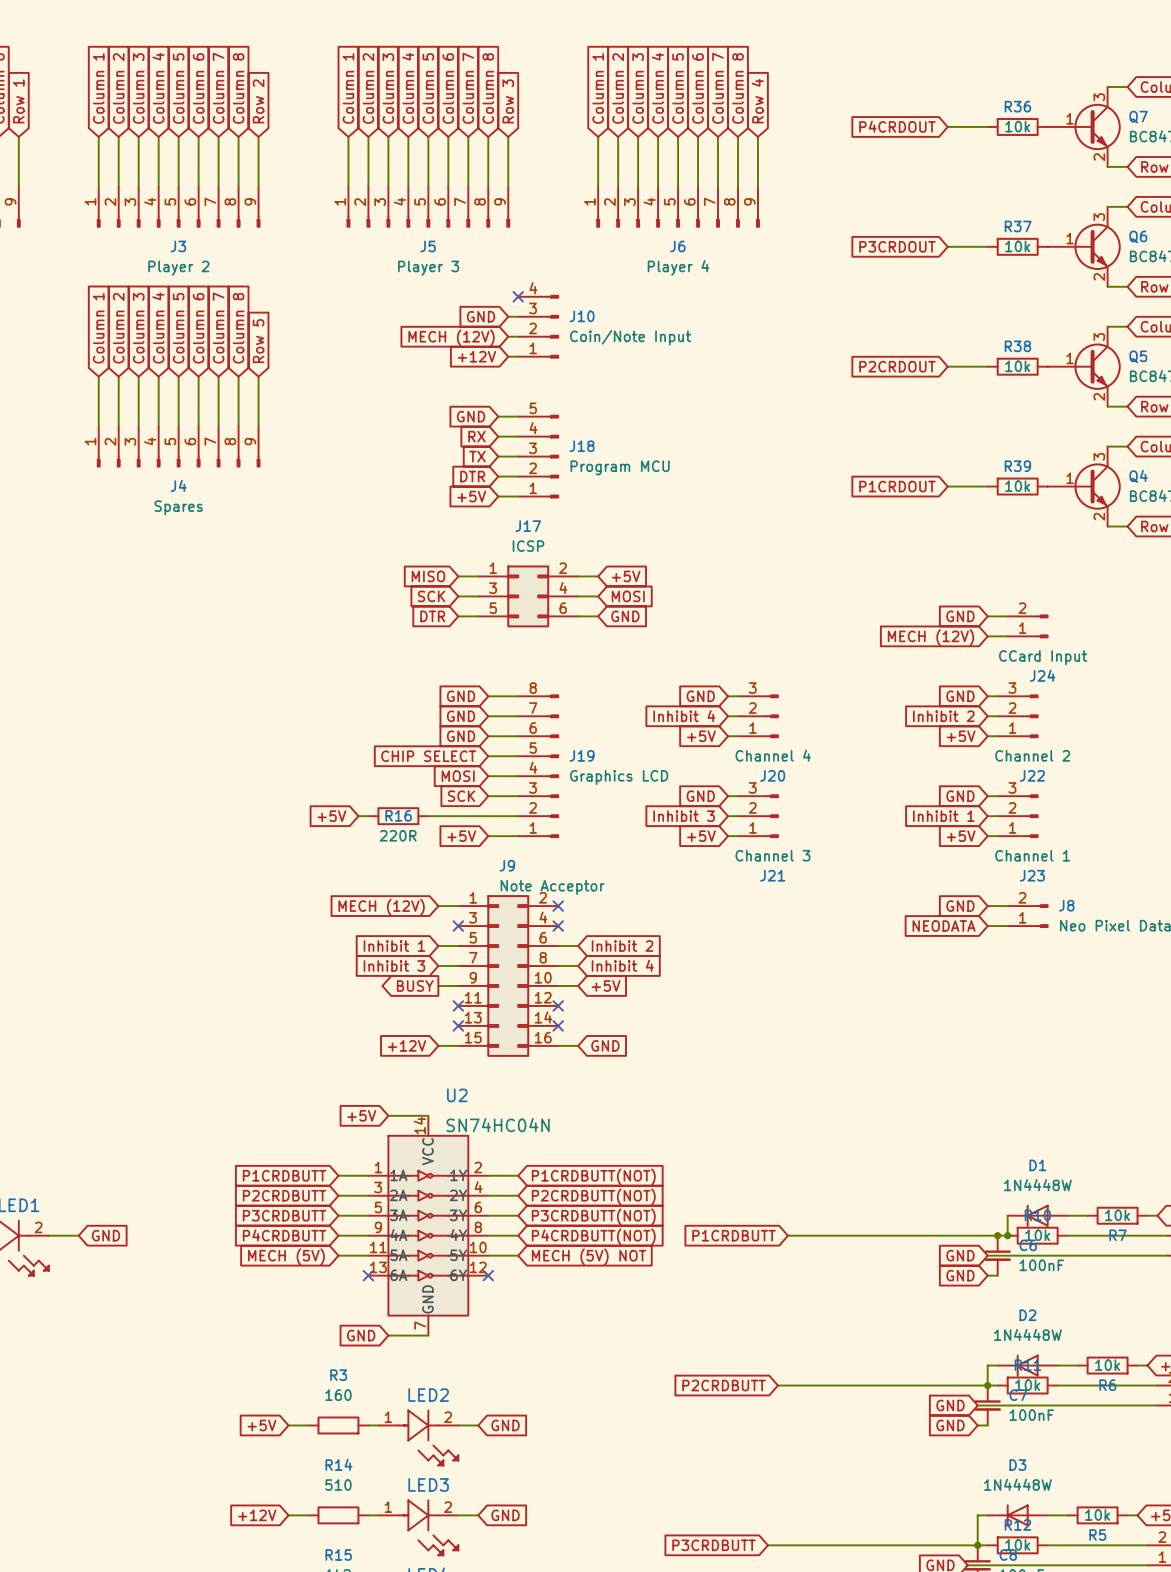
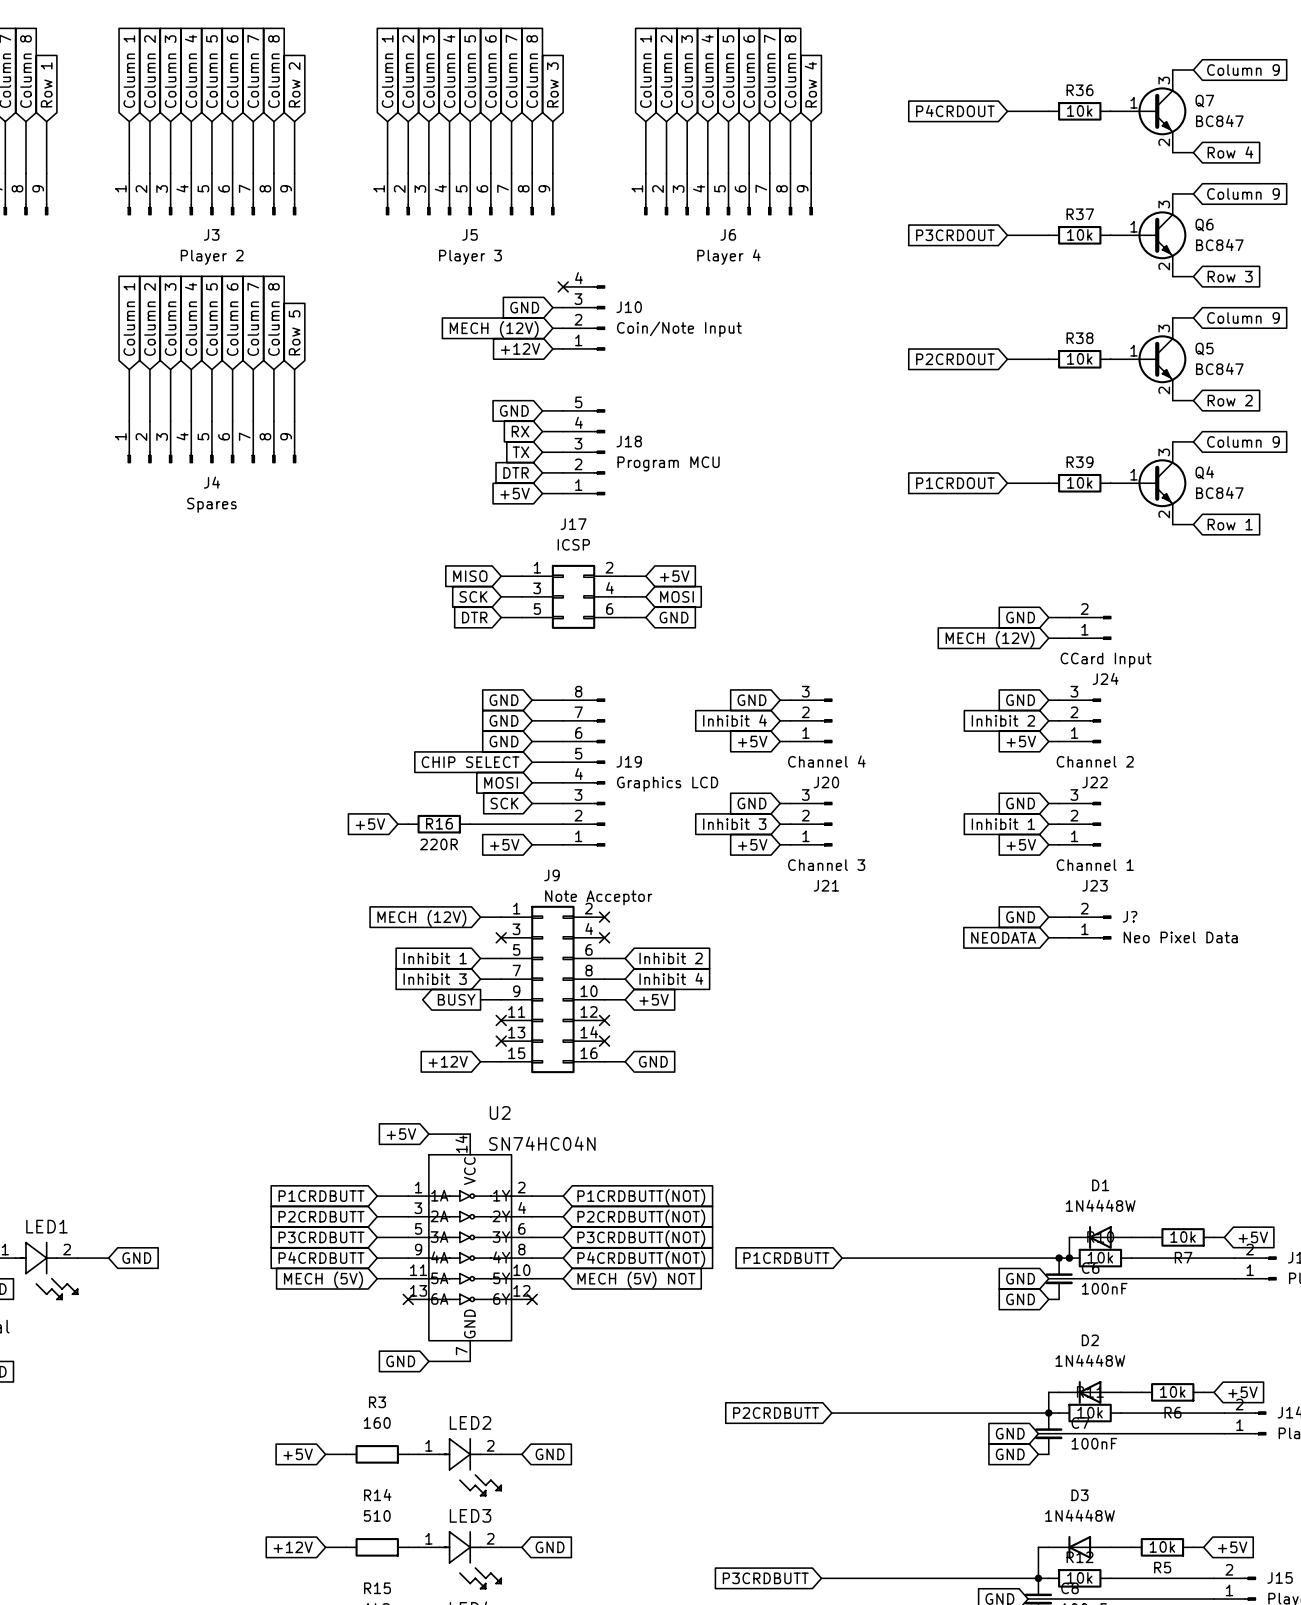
J8 name: J8 (1066, 905) -> J? (1130, 916)

